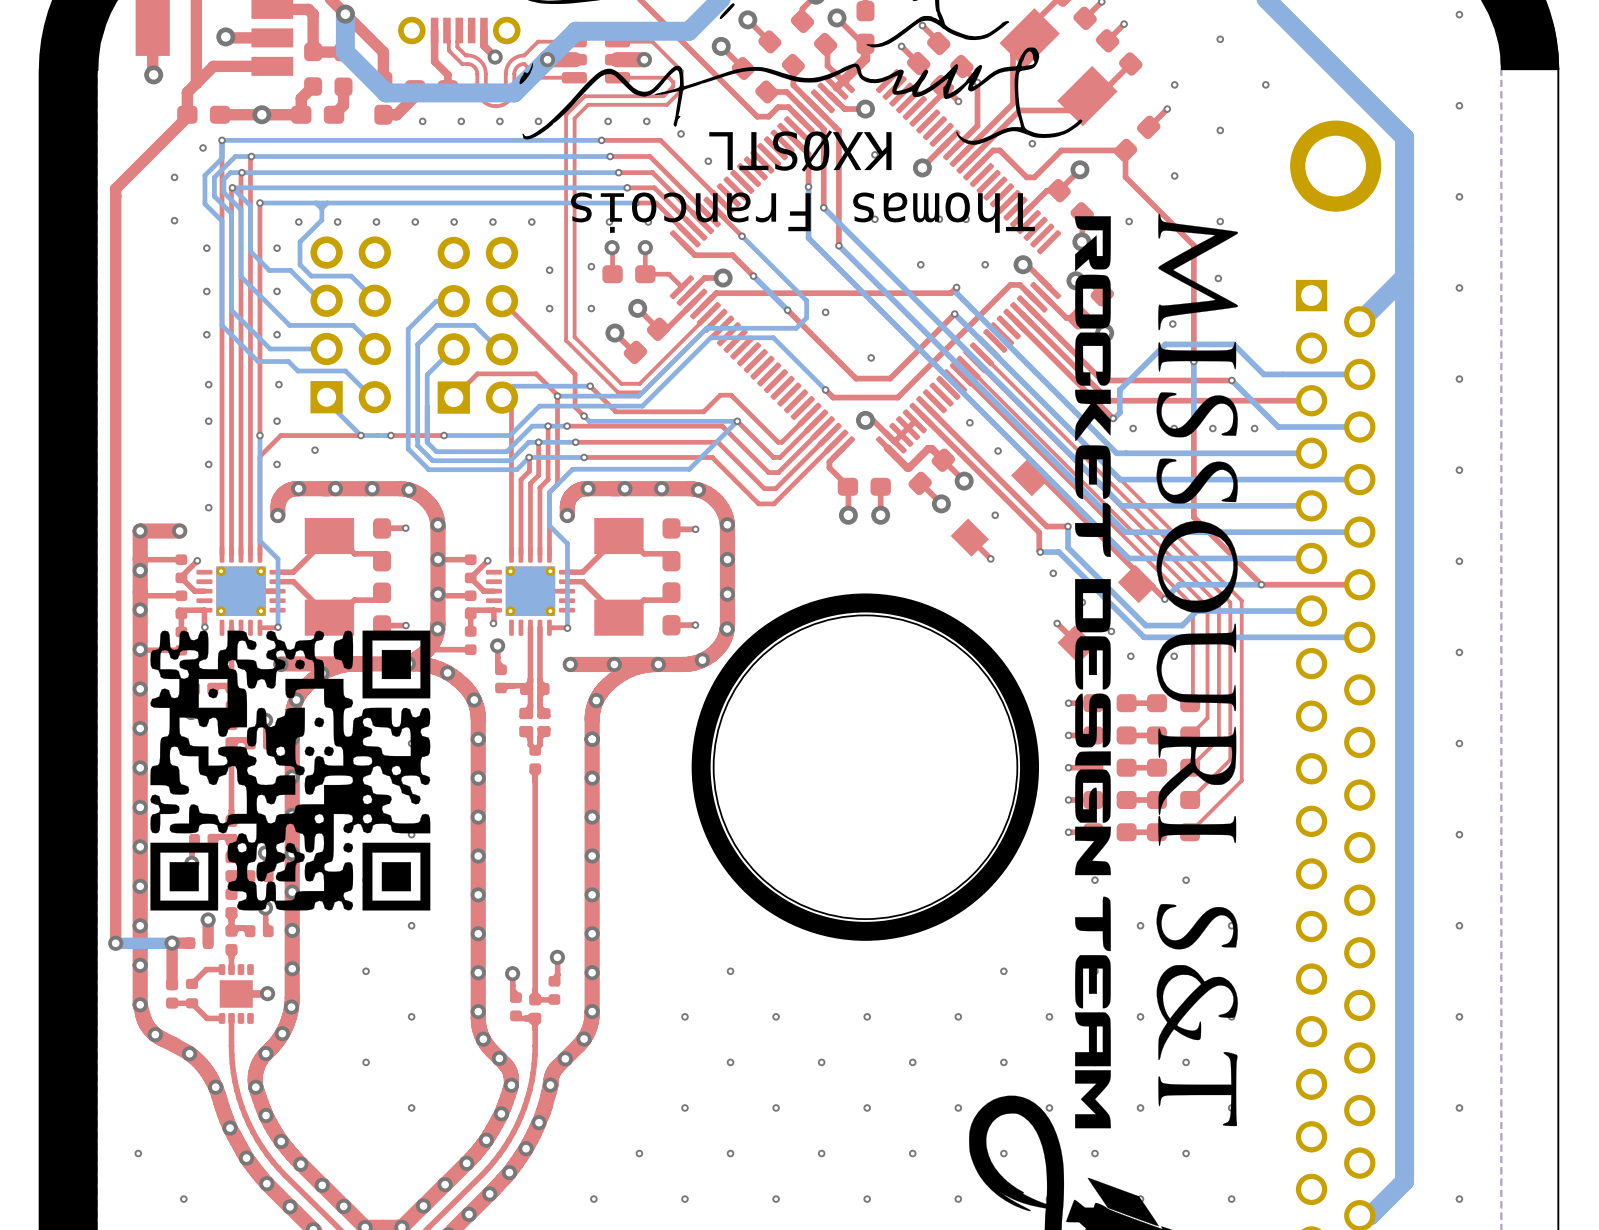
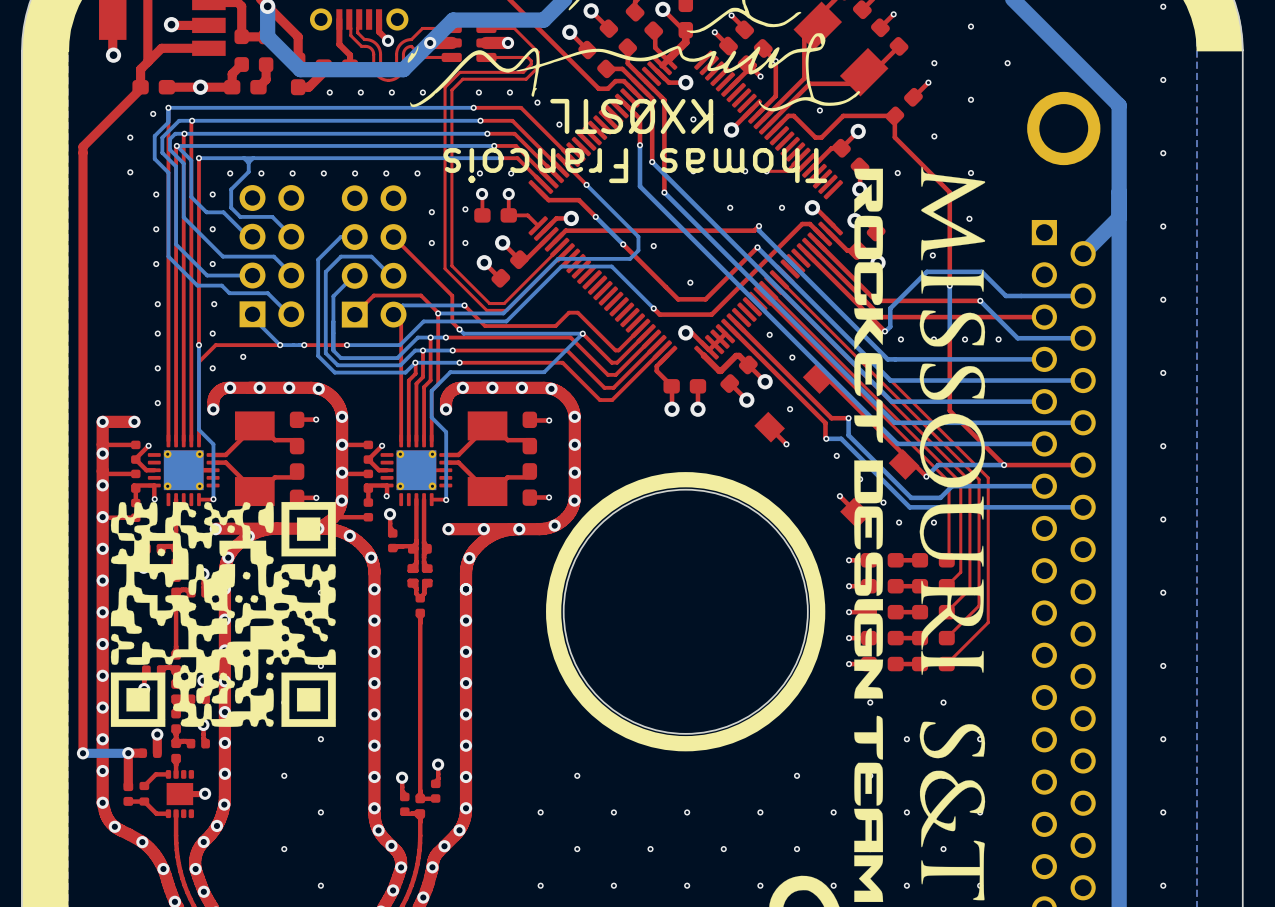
top track: none -> (800, 157) (786, 171) (766, 171)

